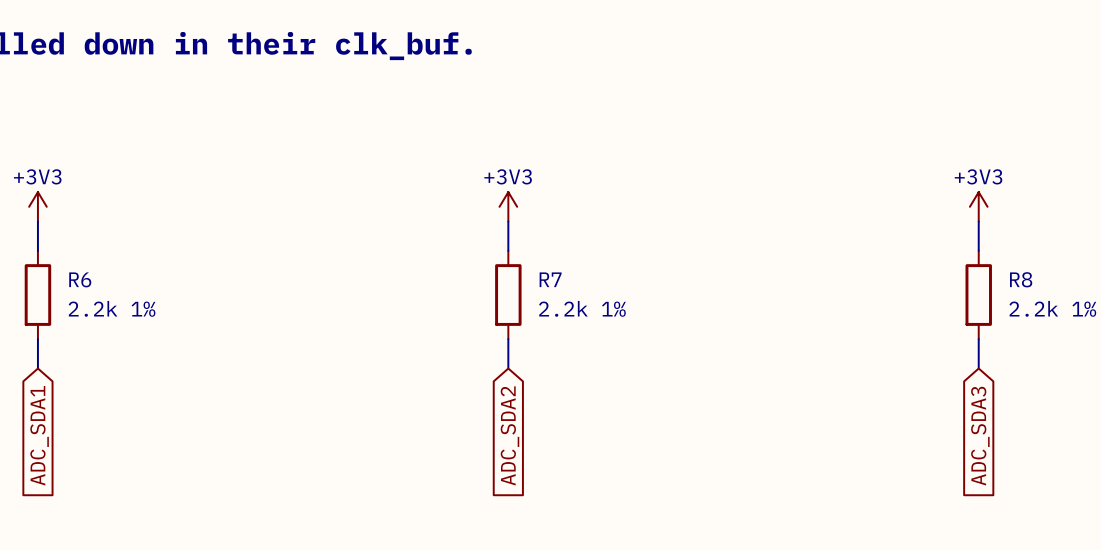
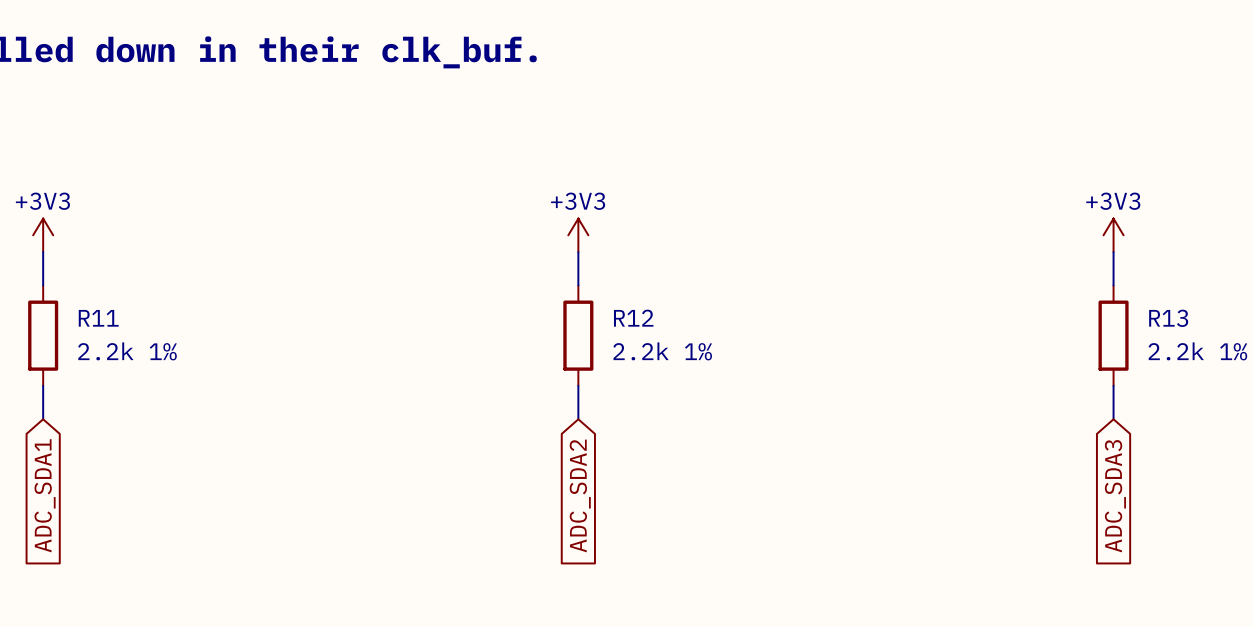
R6 name: R6 (80, 279) -> R11 (98, 318)
R7 name: R7 (550, 279) -> R12 (633, 318)
R8 name: R8 (1021, 279) -> R13 (1168, 318)

